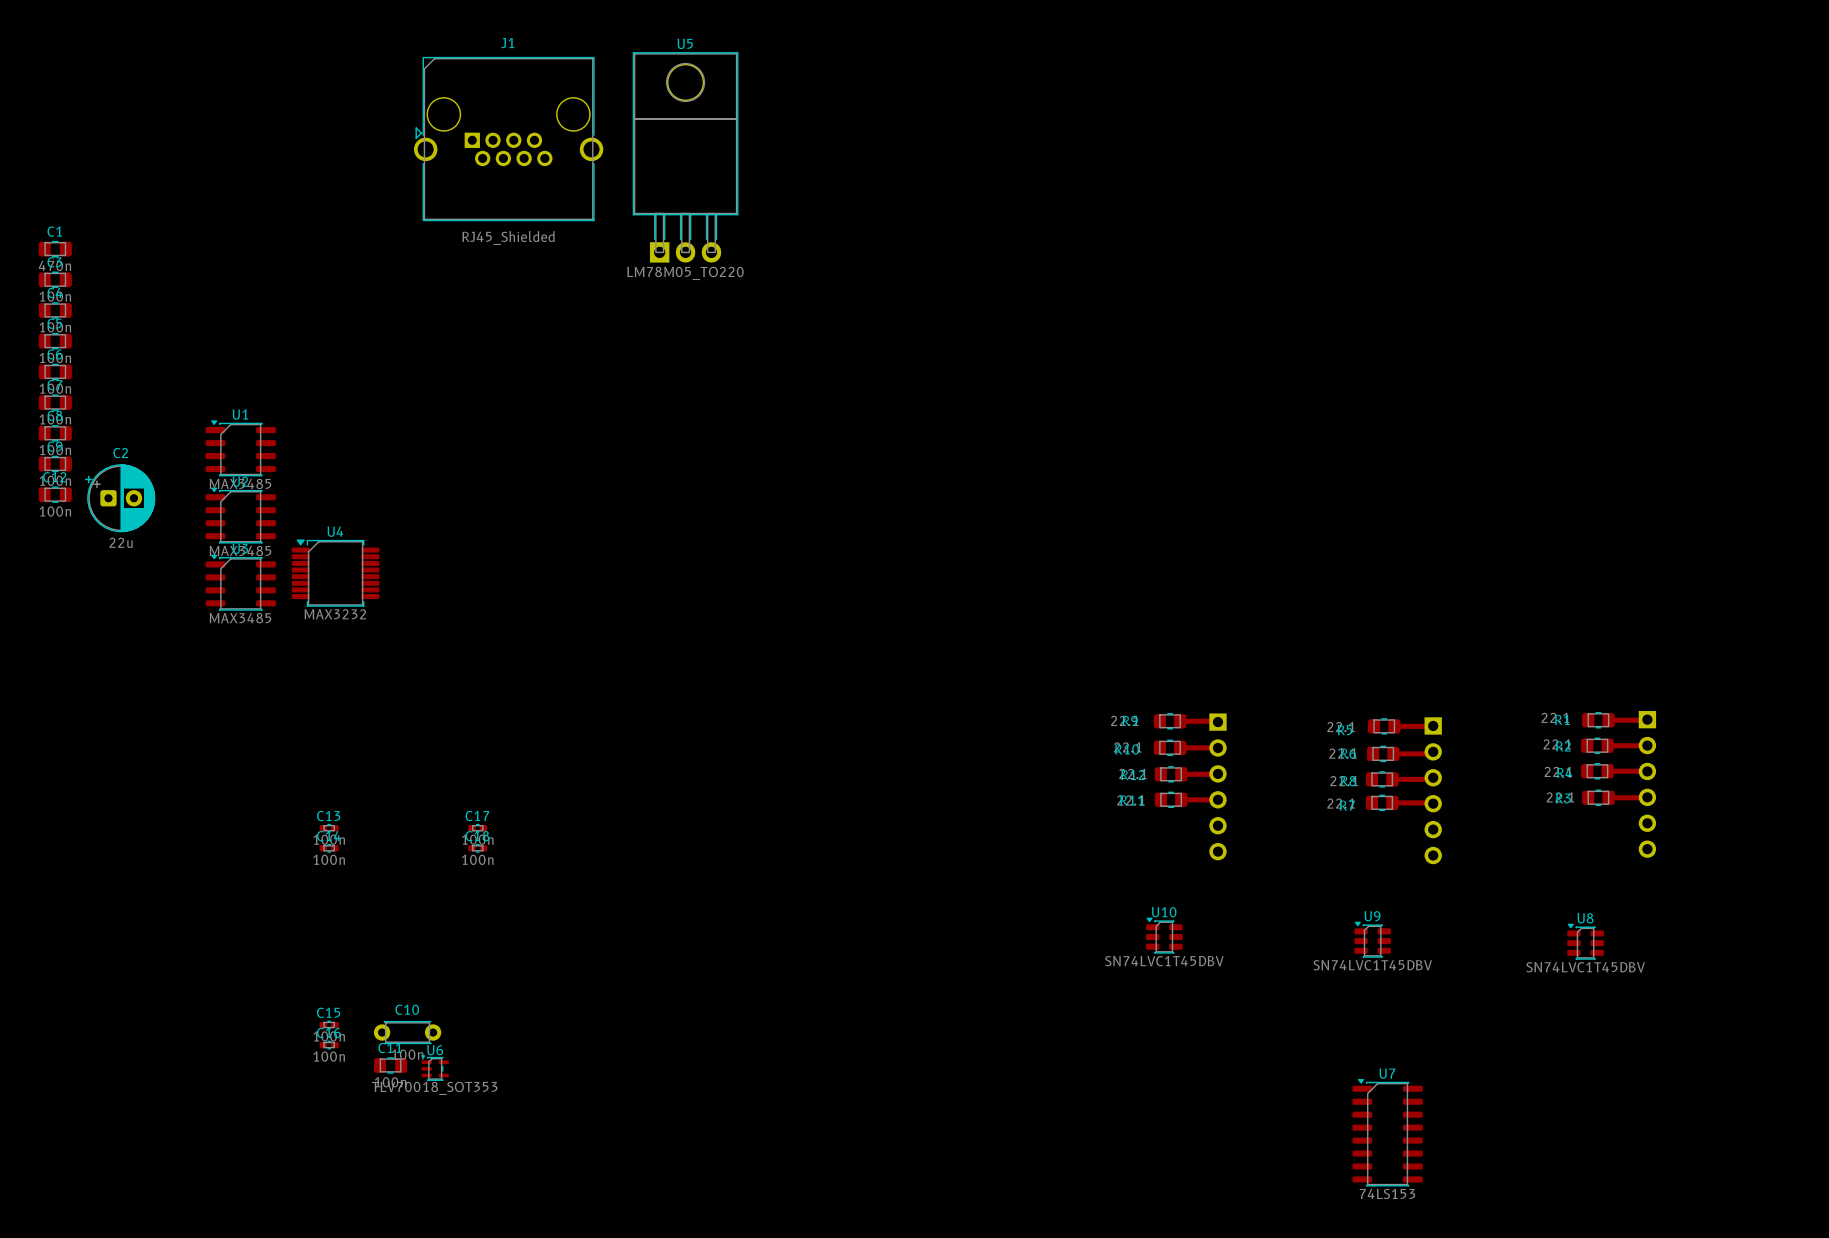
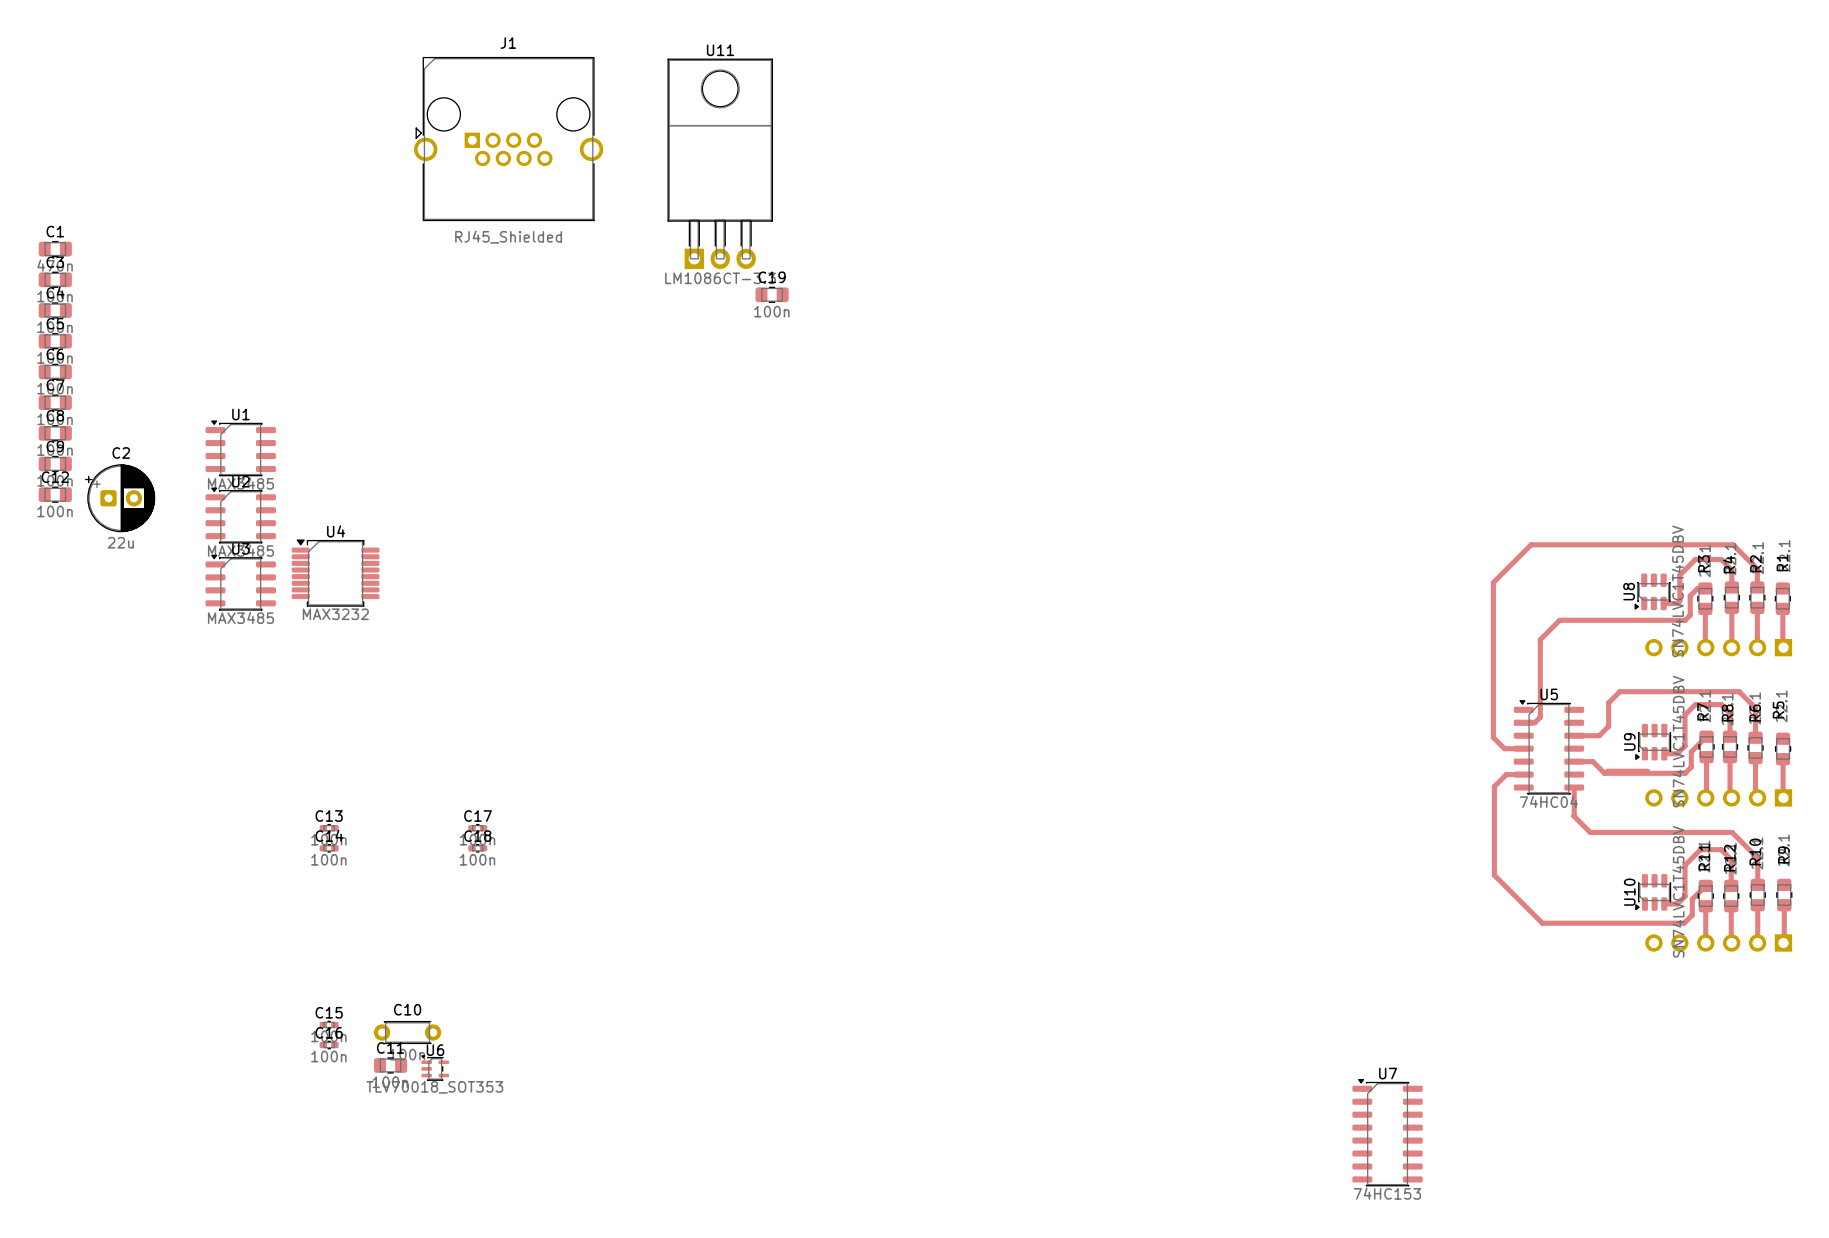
U5 name position: U5 (685, 43) -> U5 (1549, 694)
U5 footprint: [632, 52, 739, 263] -> [1513, 700, 1585, 795]
U11: none -> LM1086CT-3.3 (720, 163)
U5 value: LM78M05_TO220 (685, 273) -> 74HC04 (1548, 801)
C19: none -> 100n (772, 294)
track: none -> (1731, 587) (1731, 570) (1721, 559) (1695, 559) (1679, 575) (1679, 601) (1677, 603) (1663, 603)
track: none -> (1757, 587) (1757, 569) (1733, 544) (1531, 544) (1493, 582) (1493, 737) (1504, 748) (1523, 748)
track: none -> (1705, 588) (1697, 588) (1690, 595) (1690, 615) (1685, 620) (1559, 620) (1540, 639) (1540, 717) (1534, 722) (1523, 722)
track: none -> (1731, 607) (1731, 647)
track: none -> (1757, 607) (1757, 647)
track: none -> (1705, 608) (1705, 647)
track: none -> (1782, 608) (1783, 647)
part: none -> (1718, 647)
track: (1647, 719) (1608, 720) -> none
R1 rotation: 0° (1598, 720) -> 90° clockwise (1782, 598)
R1 position: (1598, 720) -> (1782, 598)
R9 rotation: 0° (1170, 721) -> 90° clockwise (1784, 895)
R9 position: (1170, 721) -> (1784, 895)
track: (1180, 721) (1218, 722) -> none
track: (1433, 725) (1394, 726) -> none
R5 rotation: 0° (1384, 726) -> 90° clockwise (1783, 748)
R5 position: (1384, 726) -> (1783, 748)
track: none -> (1574, 735) (1599, 735) (1608, 726) (1608, 702) (1619, 691) (1739, 691) (1755, 708) (1755, 737)
track: none -> (1706, 736) (1691, 752) (1691, 767) (1685, 773) (1604, 773) (1592, 761) (1574, 761)
track: none -> (1730, 736) (1730, 713) (1721, 704) (1695, 704) (1685, 714) (1685, 746) (1677, 753) (1664, 753)
R2 rotation: 0° (1597, 745) -> 90° clockwise (1757, 597)
R2 position: (1597, 745) -> (1757, 597)
track: (1647, 745) (1607, 745) -> none
R10 rotation: 0° (1170, 747) -> 90° clockwise (1757, 895)
R10 position: (1170, 747) -> (1757, 895)
track: (1180, 747) (1218, 748) -> none
track: (1433, 751) (1431, 753) (1393, 753) -> none
R6 rotation: 0° (1383, 753) -> 90° clockwise (1755, 747)
R6 position: (1383, 753) -> (1755, 747)
track: none -> (1706, 757) (1705, 797)
track: none -> (1730, 757) (1730, 796) (1731, 797)
track: none -> (1755, 758) (1755, 795) (1757, 797)
track: none -> (1783, 759) (1783, 797)
R4 rotation: 0° (1597, 771) -> 90° clockwise (1731, 597)
R4 position: (1597, 771) -> (1731, 597)
track: (1218, 773) (1181, 774) -> none
R12 rotation: 0° (1171, 774) -> 90° clockwise (1731, 896)
R12 position: (1171, 774) -> (1731, 896)
track: none -> (1523, 774) (1506, 774) (1494, 786) (1494, 875) (1542, 923) (1684, 923) (1692, 915) (1692, 899) (1705, 885)
track: (1433, 777) (1431, 779) (1392, 779) -> none
R8 rotation: 0° (1382, 779) -> 90° clockwise (1730, 746)
R8 position: (1382, 779) -> (1730, 746)
part rotation: 0° (1647, 784) -> 90° clockwise (1718, 797)
part: (1218, 786) -> none
track: none -> (1574, 787) (1573, 816) (1590, 832) (1732, 832) (1757, 858) (1757, 884)
part: (1433, 790) -> none
R3 rotation: 0° (1598, 797) -> 90° clockwise (1705, 598)
R3 position: (1598, 797) -> (1705, 598)
track: (1647, 797) (1608, 797) -> none
R11 rotation: 0° (1171, 799) -> 90° clockwise (1705, 896)
R11 position: (1171, 799) -> (1705, 896)
track: (1181, 799) (1218, 799) -> none
R7 rotation: 0° (1382, 802) -> 90° clockwise (1706, 746)
R7 position: (1382, 802) -> (1706, 746)
track: (1392, 802) (1433, 803) -> none
track: none -> (1731, 885) (1731, 859) (1721, 849) (1700, 849) (1685, 865) (1685, 896) (1677, 904) (1664, 904)
track: none -> (1757, 905) (1757, 942)
track: none -> (1784, 905) (1783, 942)
track: none -> (1705, 906) (1705, 942)
track: none -> (1731, 906) (1731, 942)
U10 rotation: 0° (1164, 935) -> 90° counterclockwise (1653, 892)
U10 position: (1164, 935) -> (1653, 892)
U9 rotation: 0° (1372, 939) -> 90° counterclockwise (1653, 742)
U9 position: (1372, 939) -> (1653, 742)
U8 rotation: 0° (1585, 941) -> 90° counterclockwise (1652, 591)
U8 position: (1585, 941) -> (1652, 591)
part: none -> (1718, 942)
U7 value: 74LS153 (1387, 1193) -> 74HC153 (1387, 1193)

